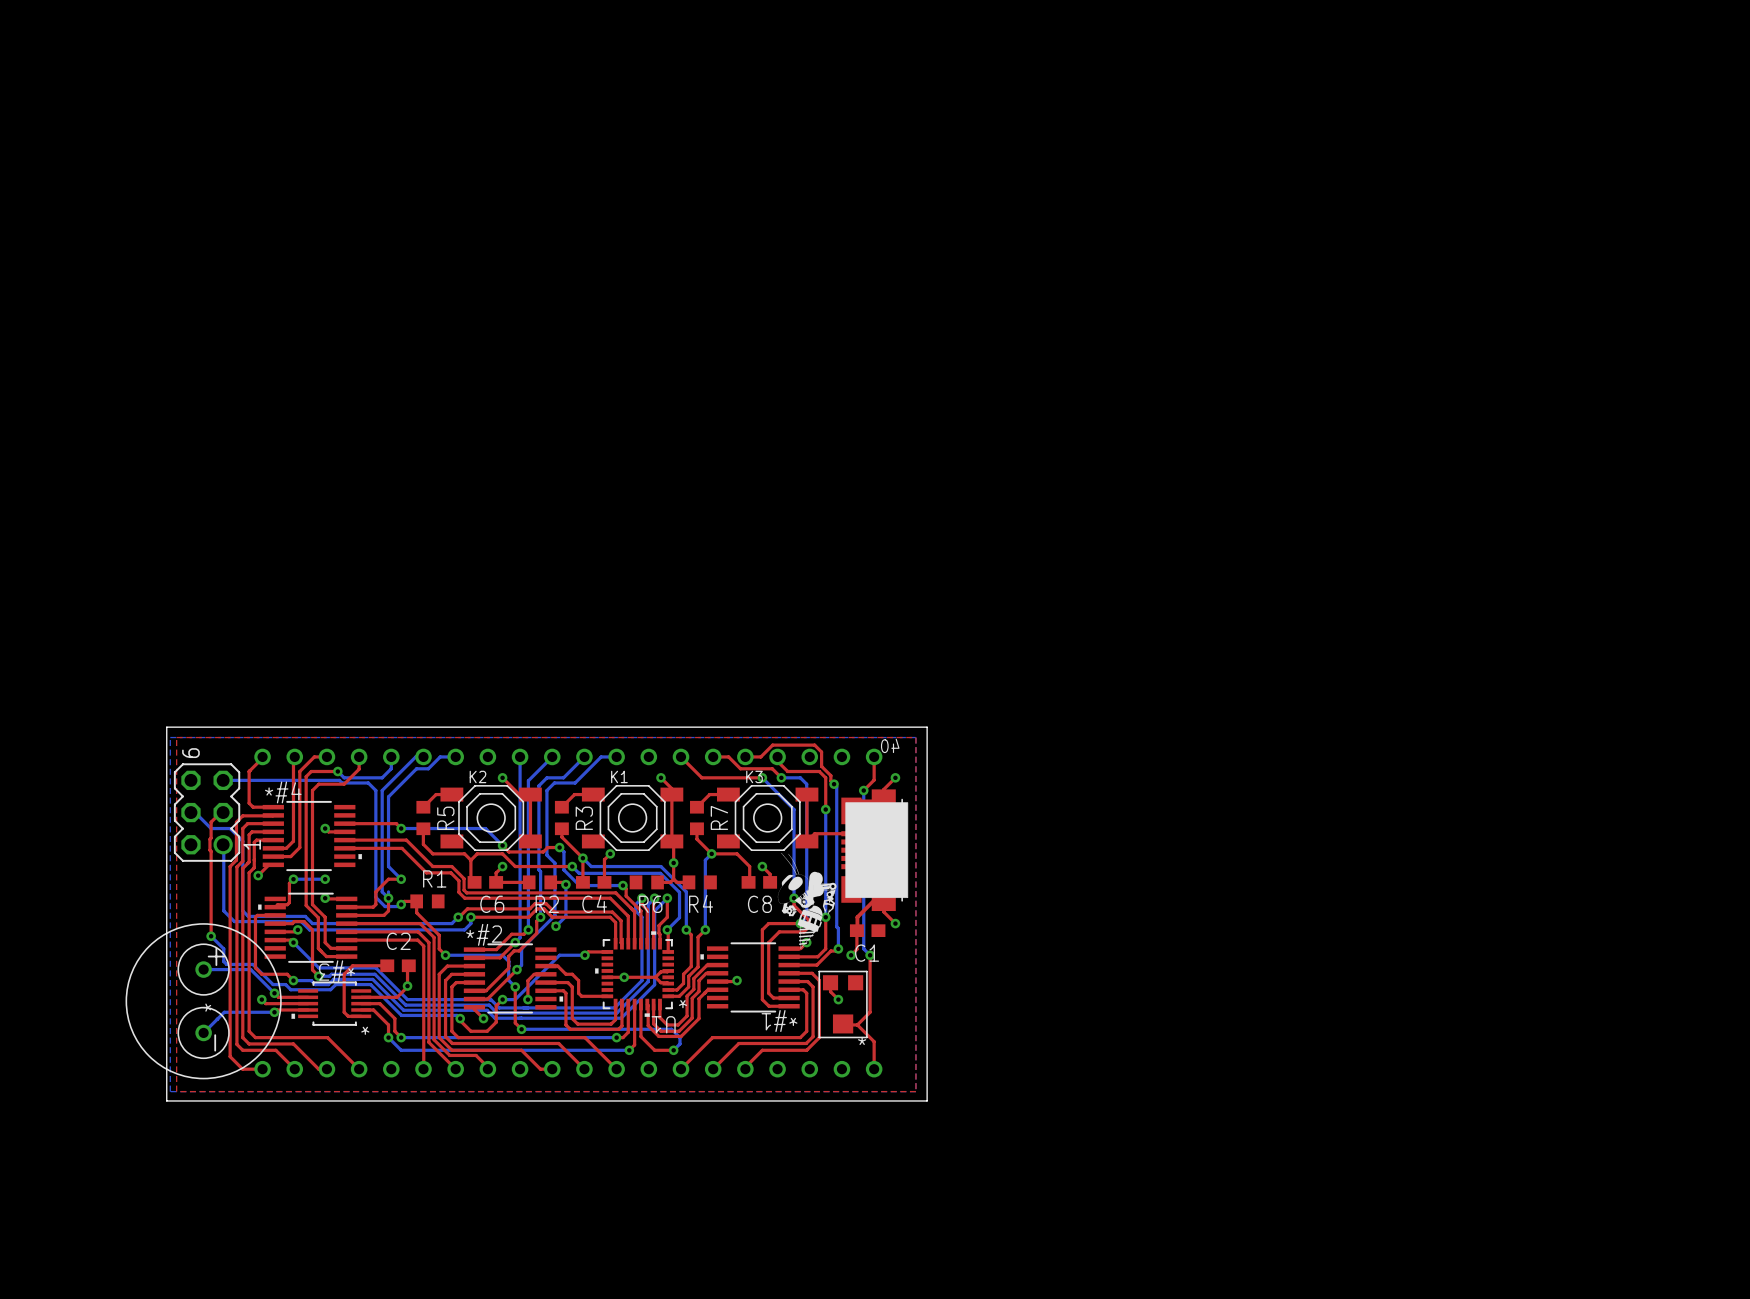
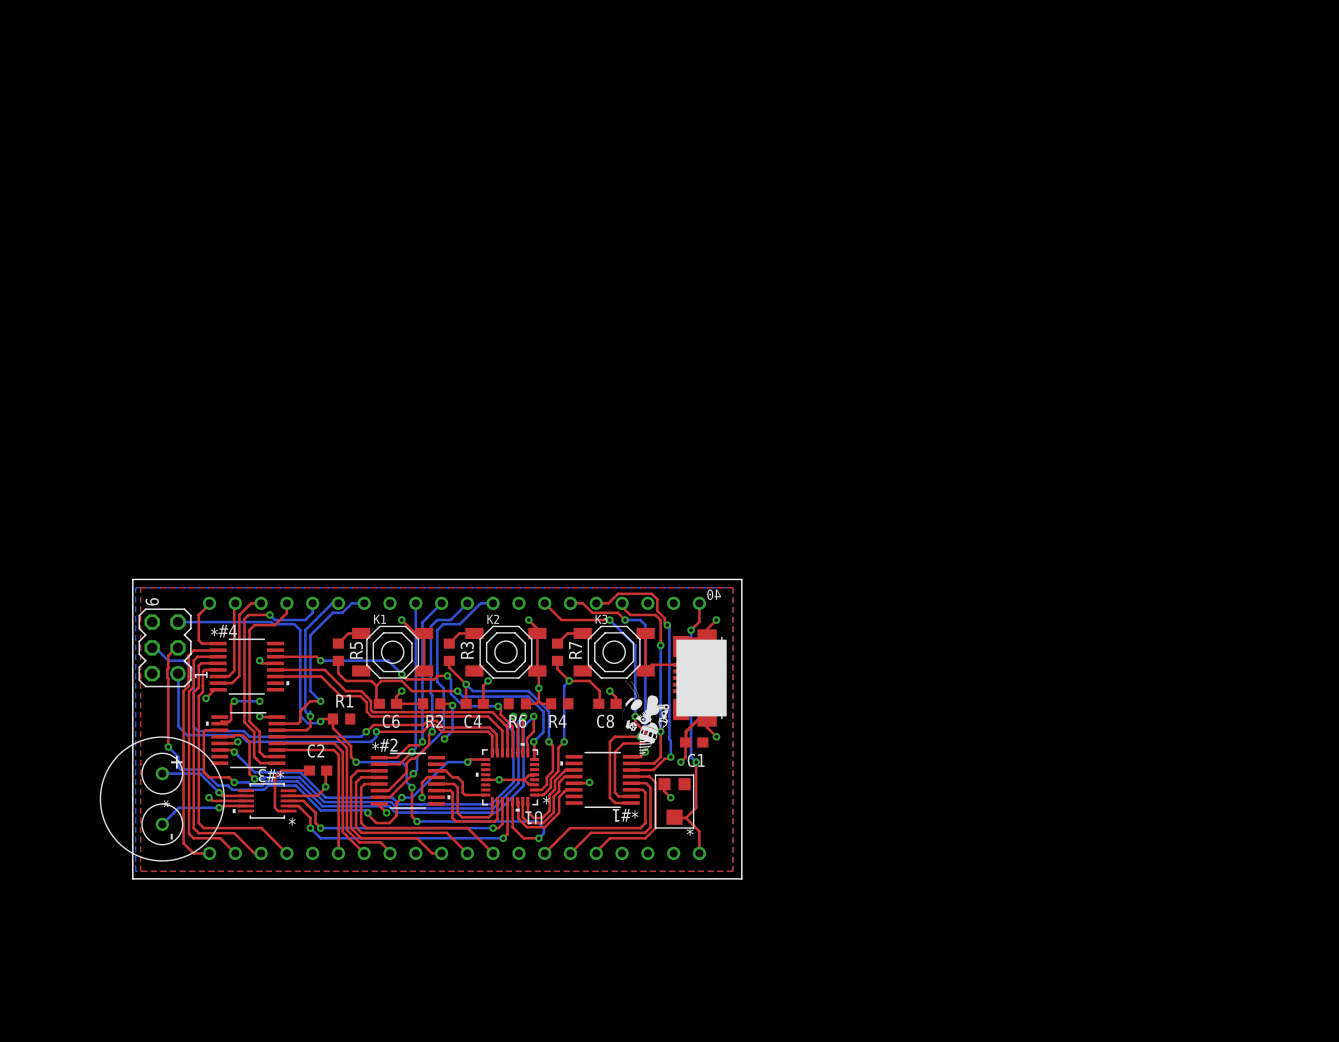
K2 name: K2 (477, 776) -> K1 (380, 619)
K1 name: K1 (619, 776) -> K2 (493, 619)

